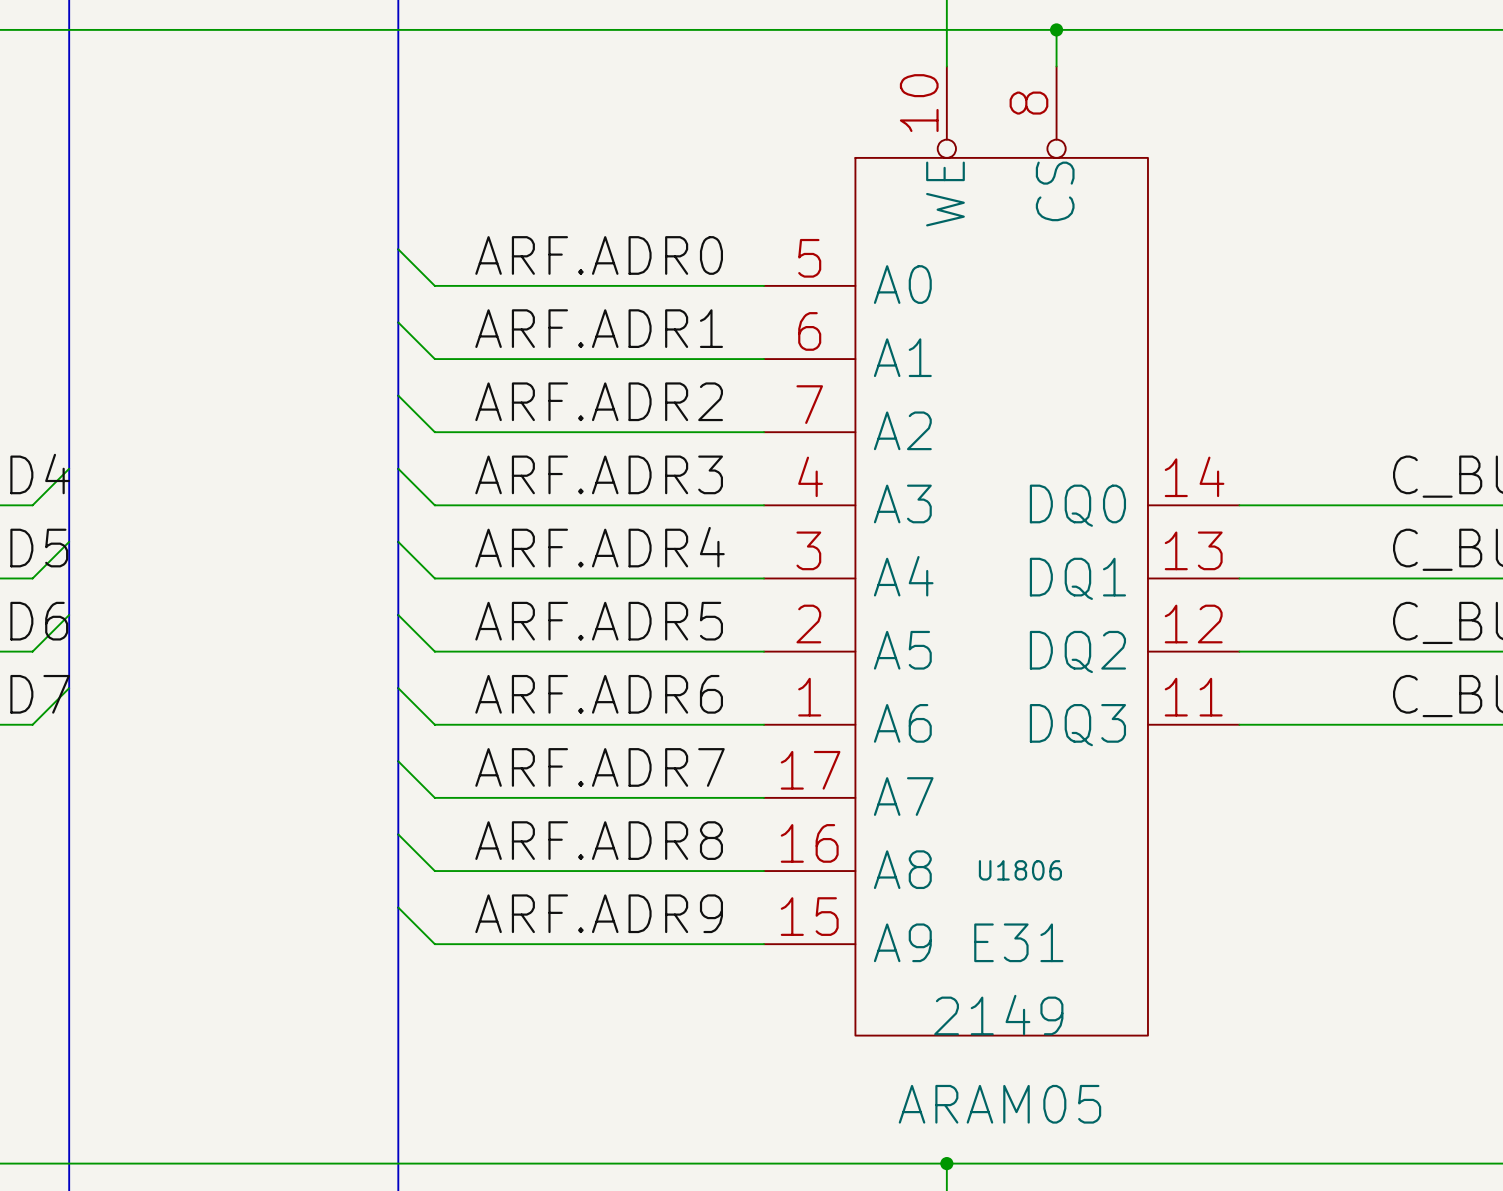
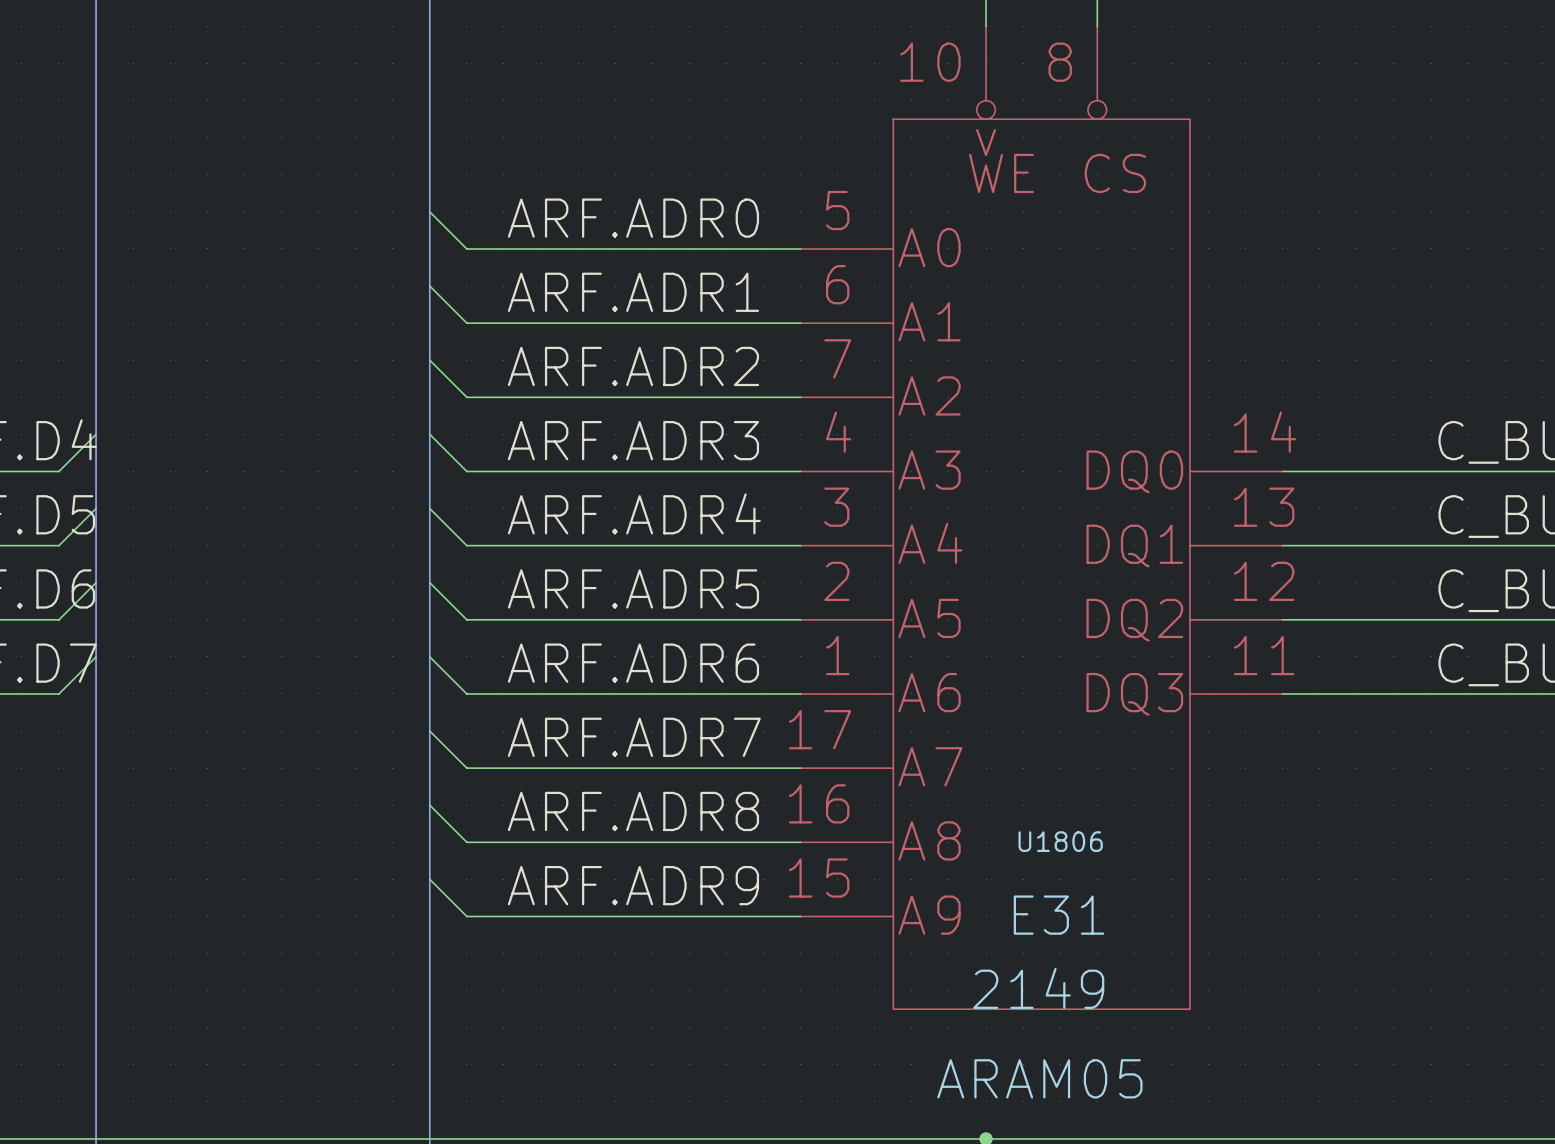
U1806 symbol: [764, 66, 1240, 1036] -> [800, 26, 1283, 1010]

